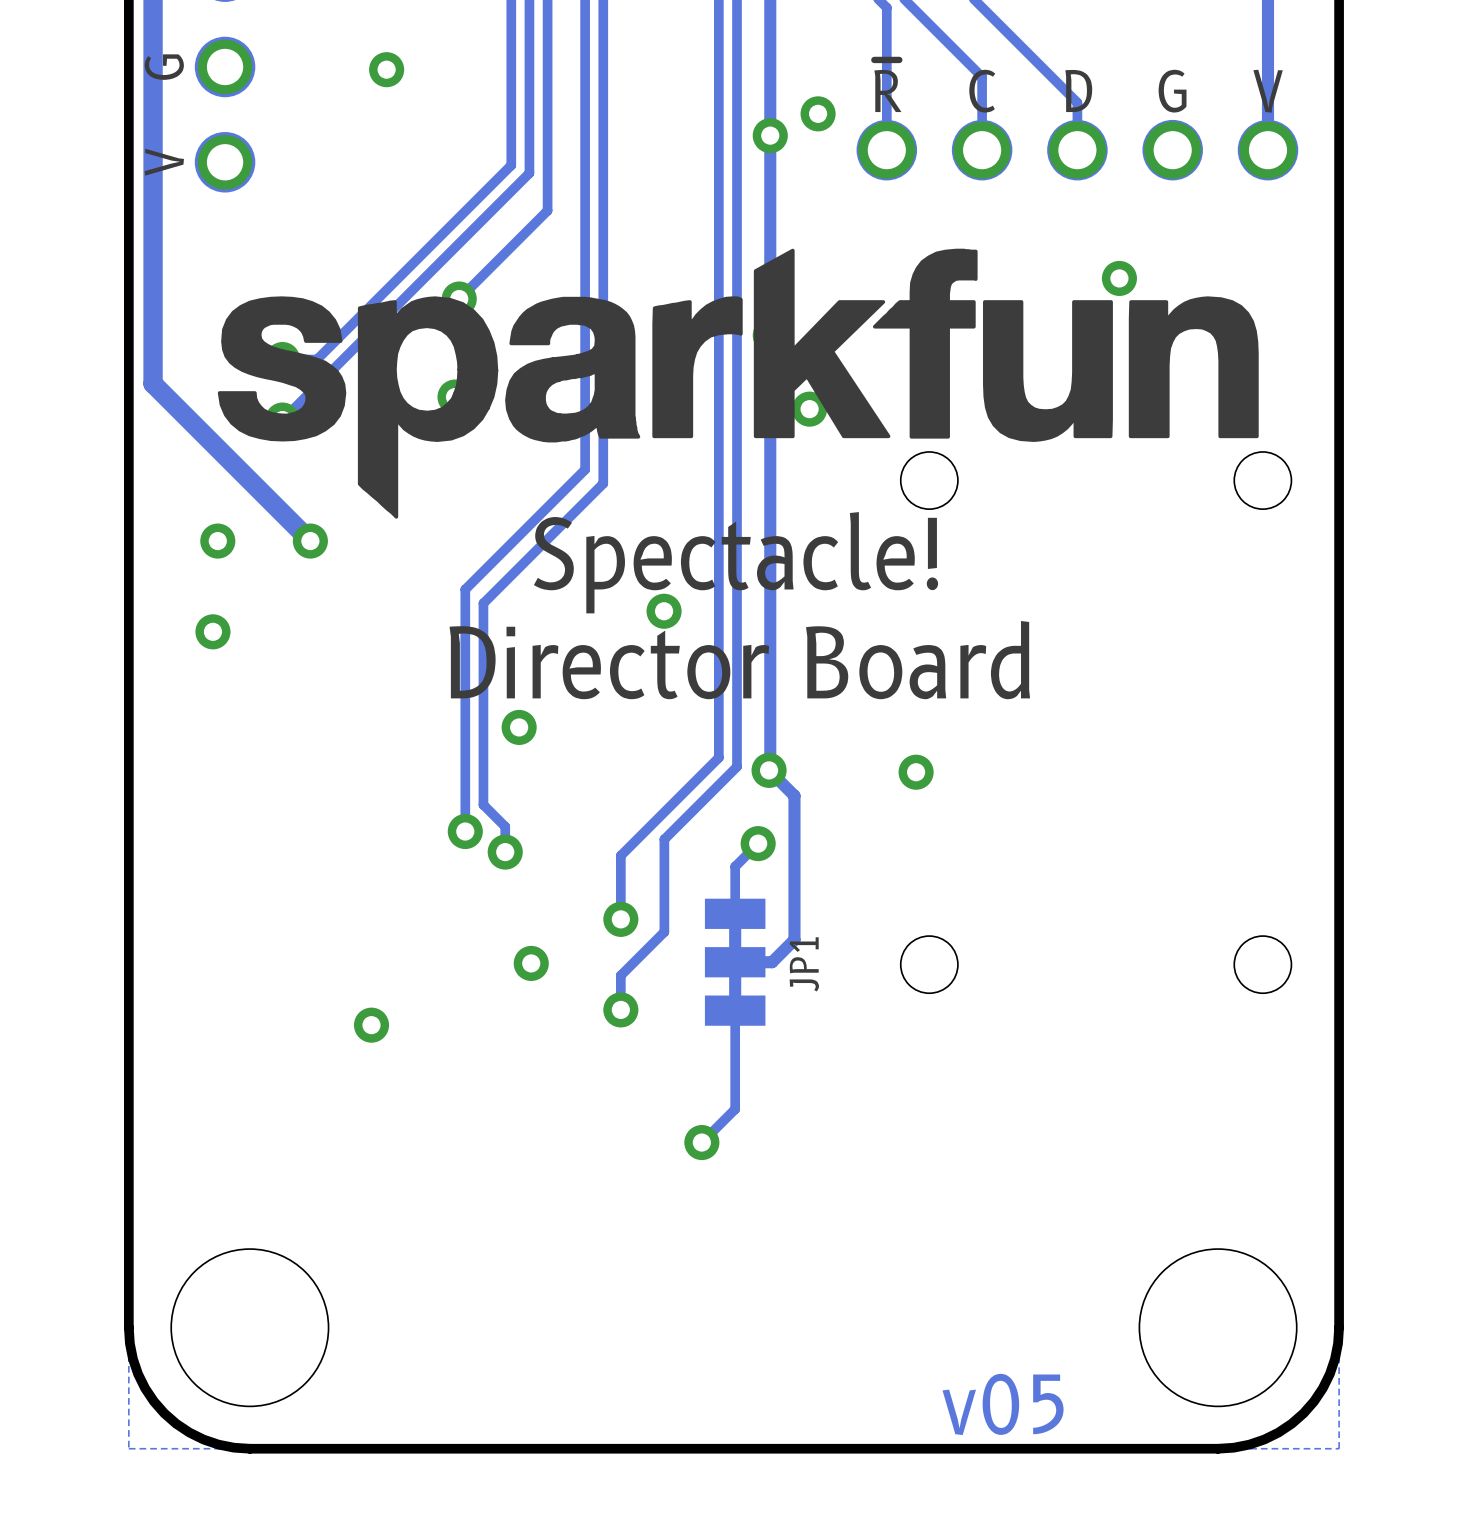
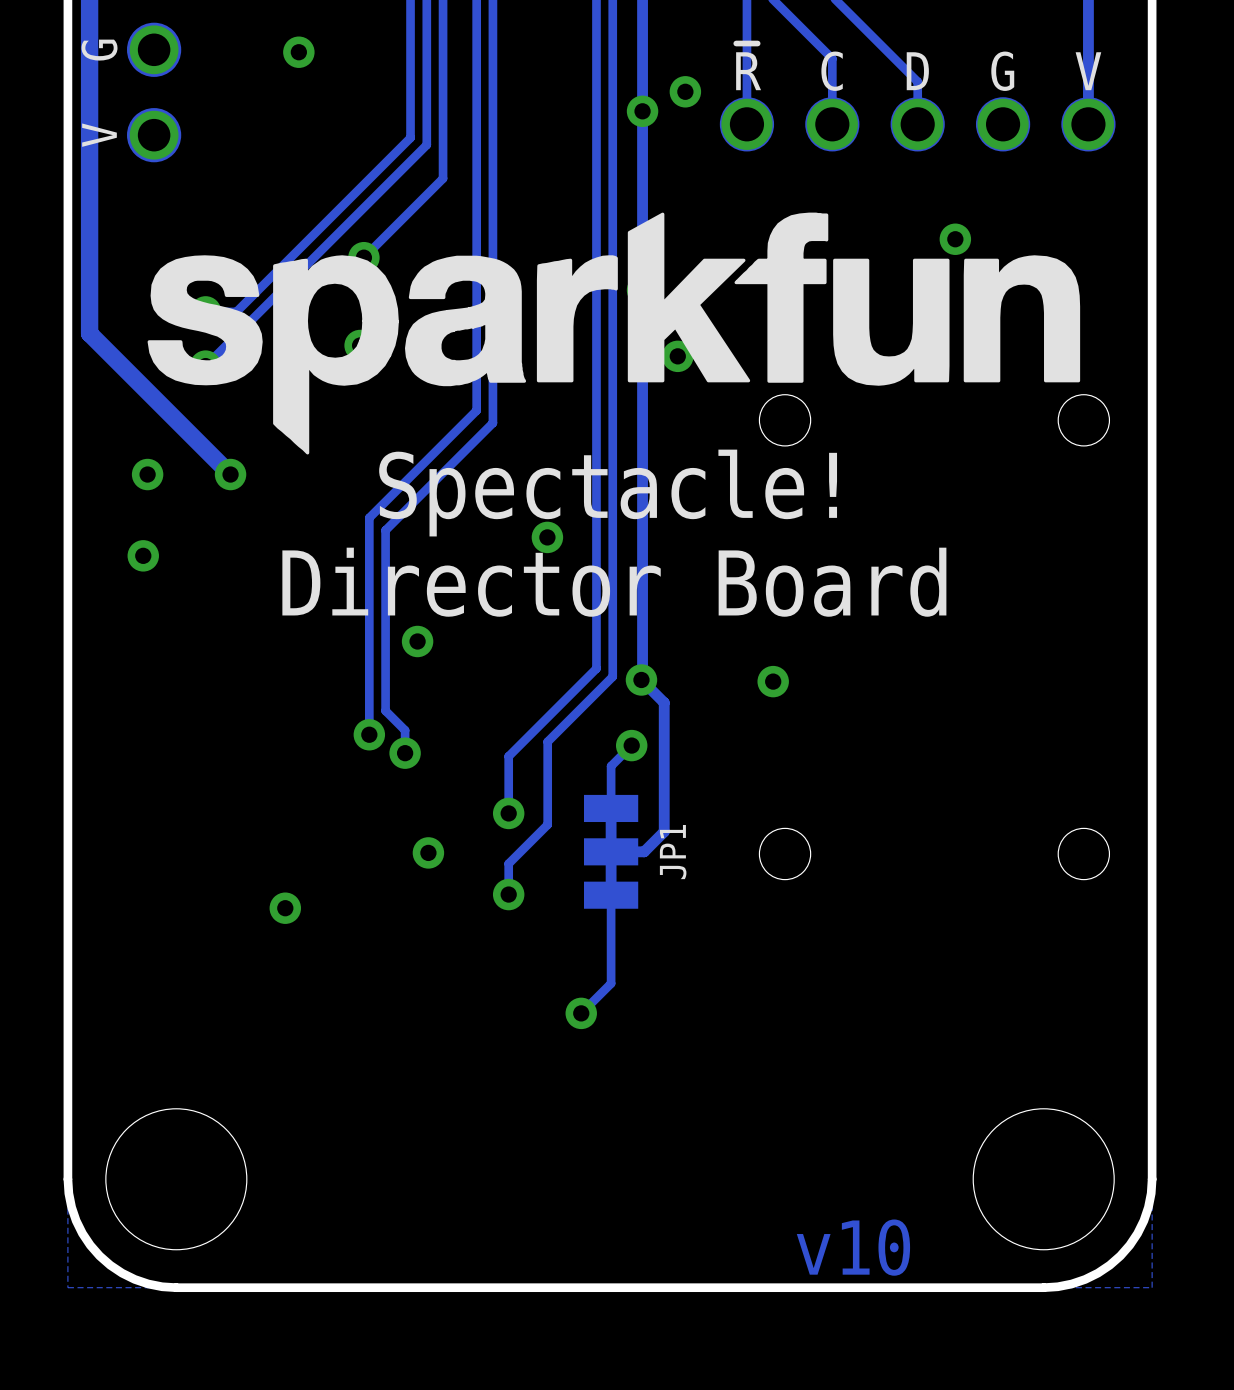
text: v05 (1003, 1404) -> v10 (853, 1247)

